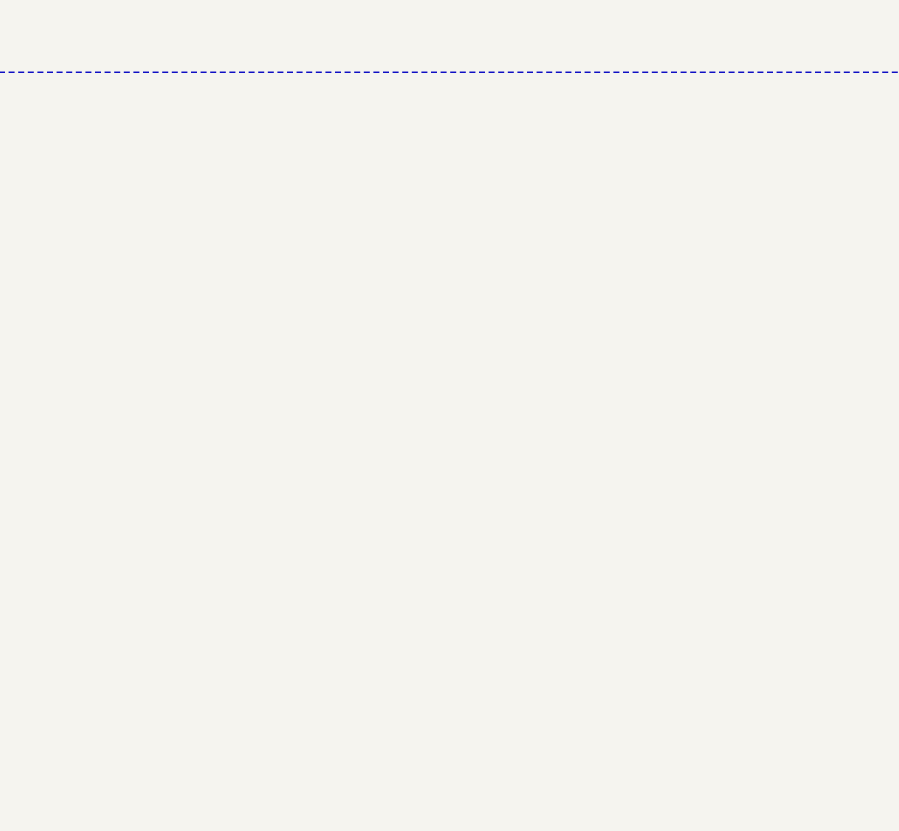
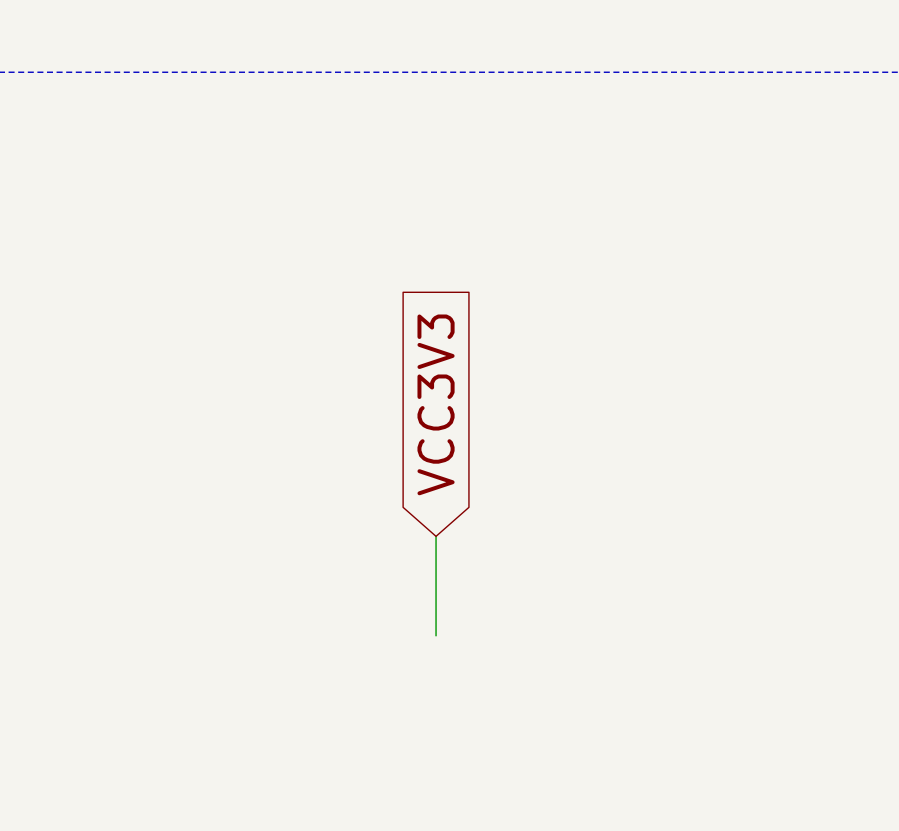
global label: none -> VCC3V3 (436, 404)
wire: none -> (436, 536) (436, 635)

